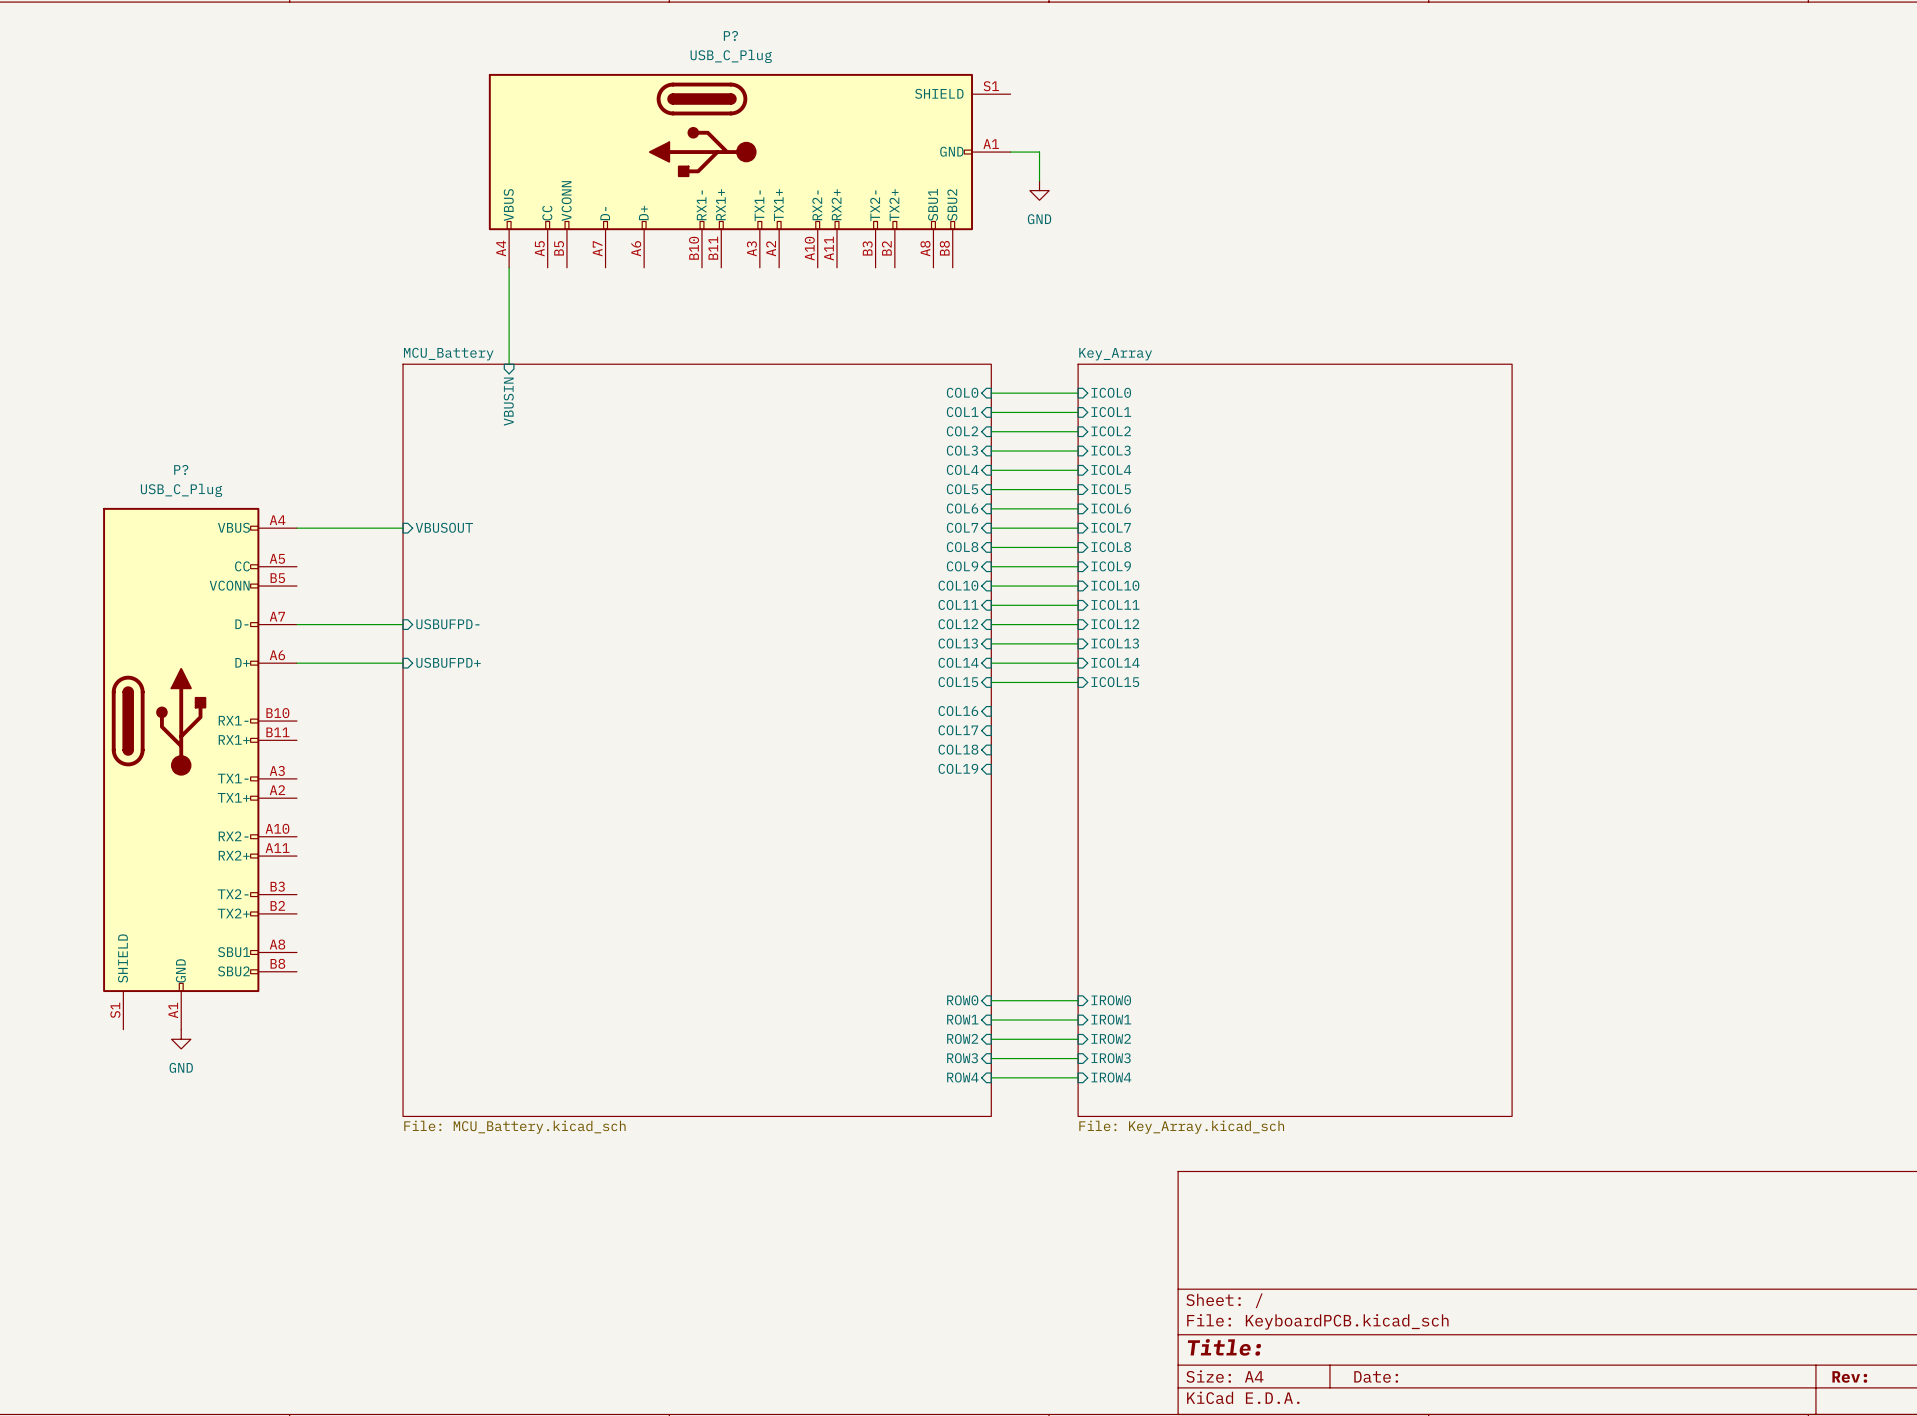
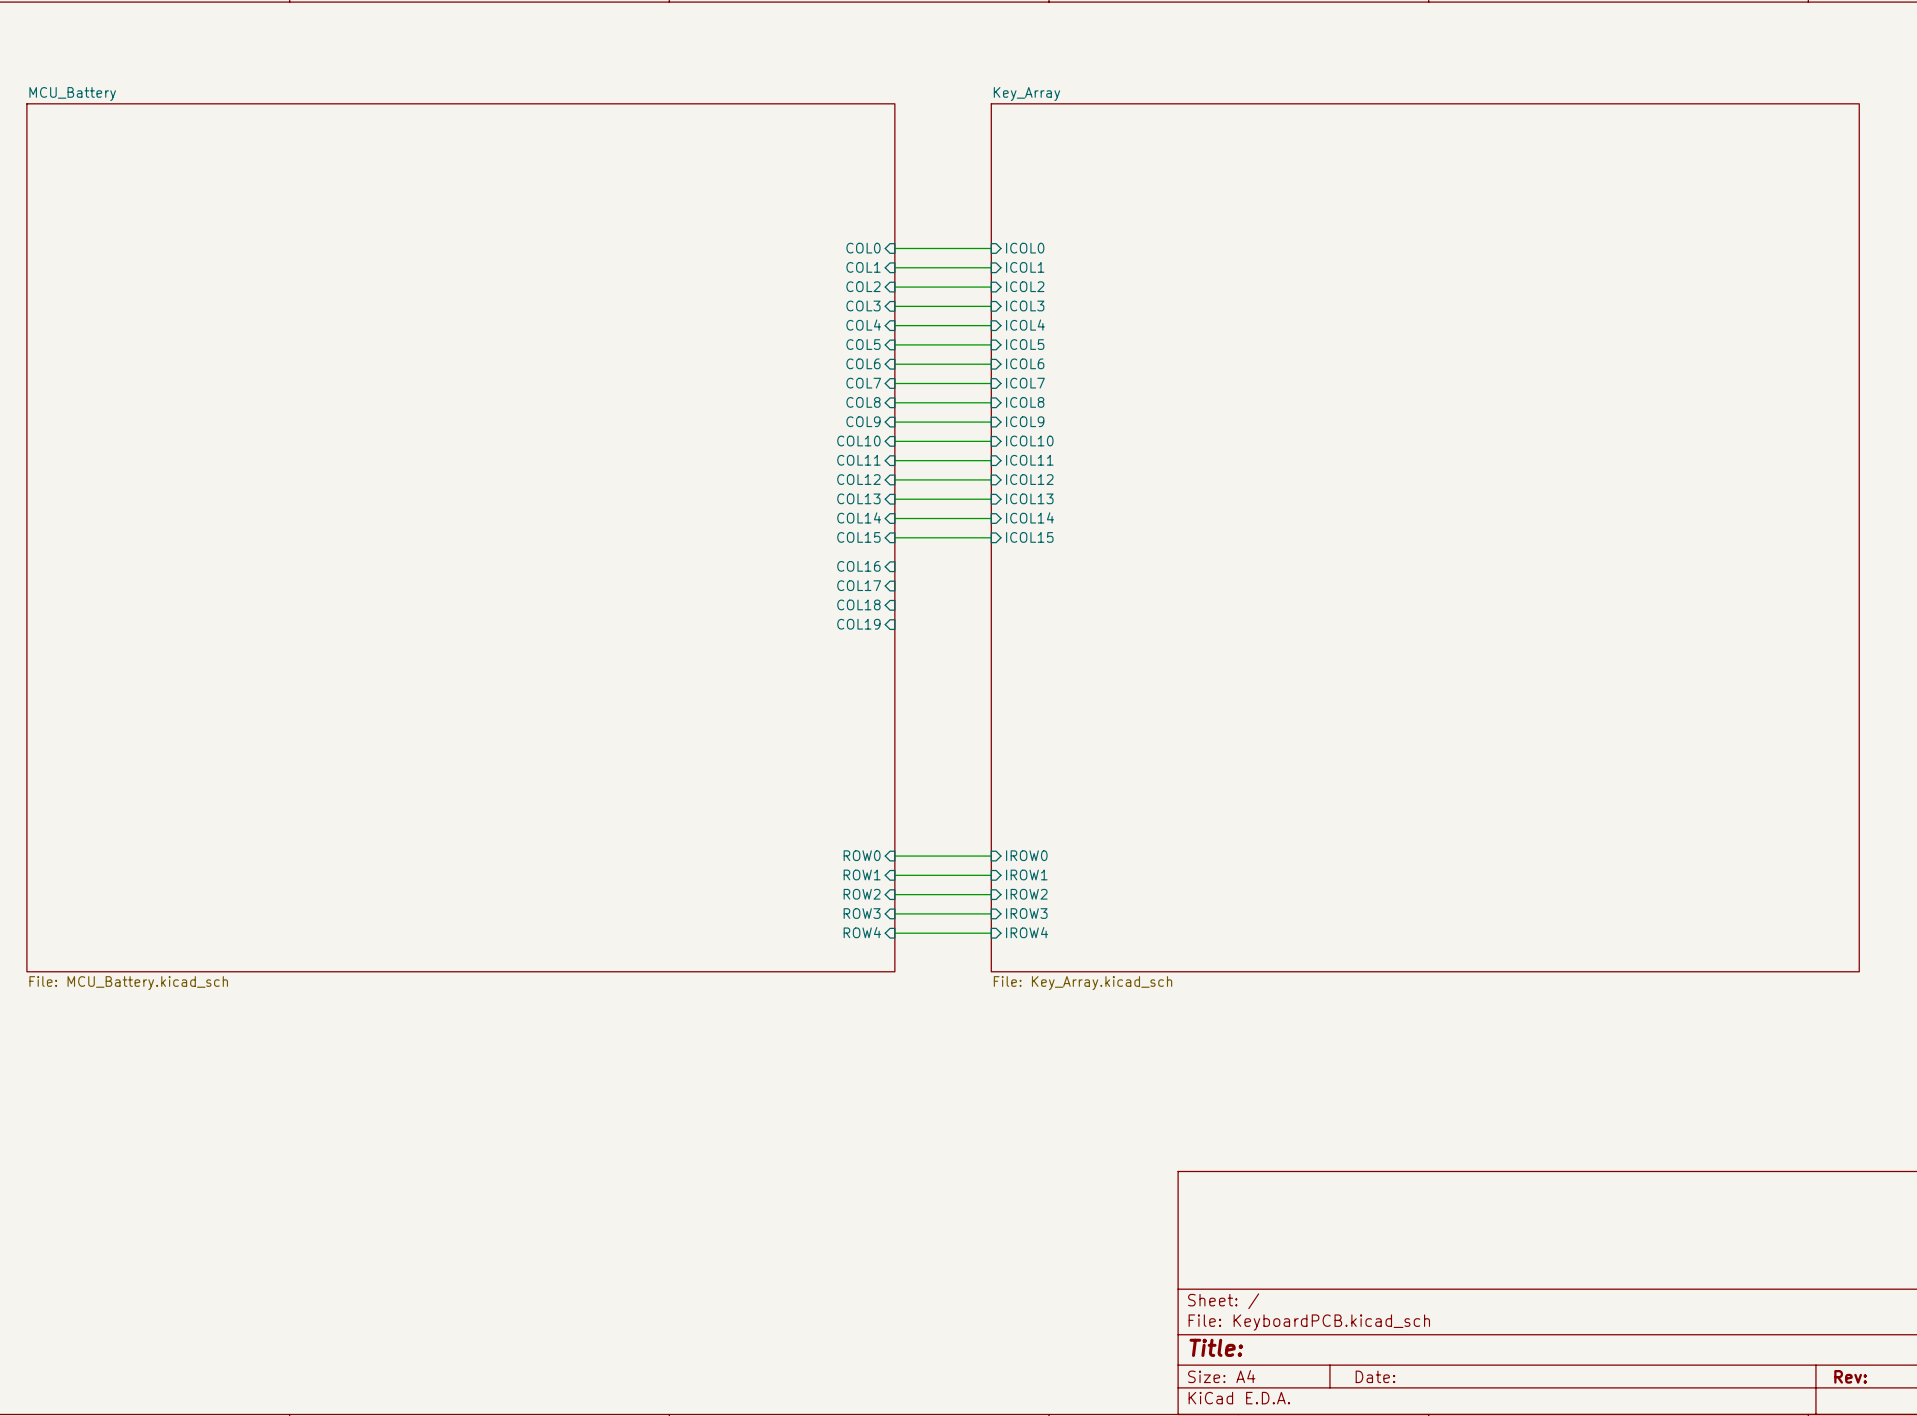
wire: (1010, 152) (1039, 152) (1039, 180) -> none
P?: USB_C_Plug (749, 170) -> none
power symbol: GND (1039, 190) -> none
wire: none -> (894, 248) (991, 248)
wire: (509, 267) (509, 364) -> none
wire: none -> (894, 267) (991, 267)
wire: none -> (894, 287) (991, 287)
wire: none -> (894, 306) (991, 306)
wire: none -> (894, 325) (991, 325)
wire: none -> (894, 344) (991, 344)
wire: none -> (894, 383) (991, 383)
sheet pin position: COL0 (962, 392) -> COL0 (863, 248)
sheet pin position: ICOL0 (1111, 392) -> ICOL0 (1025, 248)
wire: (991, 393) (1078, 393) -> none
sheet pin: VBUSIN (508, 401) -> none
wire: none -> (894, 402) (991, 402)
sheet pin position: COL1 (962, 412) -> COL1 (863, 267)
wire: (991, 412) (1078, 412) -> none
sheet pin position: ICOL1 (1111, 412) -> ICOL1 (1025, 267)
wire: none -> (894, 422) (991, 422)
sheet pin position: COL2 (962, 431) -> COL2 (863, 286)
wire: (991, 431) (1078, 431) -> none
sheet pin position: ICOL2 (1111, 431) -> ICOL2 (1025, 286)
wire: none -> (894, 441) (991, 441)
sheet pin position: COL3 (962, 450) -> COL3 (863, 305)
sheet pin position: ICOL3 (1111, 450) -> ICOL3 (1025, 305)
wire: (991, 451) (1078, 451) -> none
wire: none -> (894, 460) (991, 460)
sheet pin position: COL4 (962, 469) -> COL4 (863, 325)
sheet pin position: ICOL4 (1111, 469) -> ICOL4 (1025, 325)
wire: (991, 470) (1078, 470) -> none
wire: none -> (894, 479) (991, 479)
sheet pin position: COL5 (962, 489) -> COL5 (863, 344)
wire: (991, 489) (1078, 489) -> none
sheet pin position: ICOL5 (1111, 489) -> ICOL5 (1025, 344)
wire: none -> (894, 499) (991, 499)
sheet pin position: COL6 (962, 508) -> COL6 (863, 363)
wire: (991, 508) (1078, 508) -> none
sheet pin position: ICOL6 (1111, 508) -> ICOL6 (1025, 363)
wire: none -> (894, 518) (991, 518)
sheet pin: VBUSOUT (444, 527) -> none
sheet pin position: COL7 (962, 527) -> COL7 (863, 383)
sheet pin position: ICOL7 (1111, 527) -> ICOL7 (1025, 383)
wire: (296, 528) (403, 528) -> none
wire: (991, 528) (1078, 528) -> none
sheet MCU_Battery: none -> File: MCU_Battery.kicad_sch (460, 537)
wire: none -> (894, 537) (991, 537)
sheet Key_Array: none -> File: Key_Array.kicad_sch (1425, 537)
sheet pin position: COL8 (962, 547) -> COL8 (863, 402)
wire: (991, 547) (1078, 547) -> none
sheet pin position: ICOL8 (1111, 547) -> ICOL8 (1025, 402)
sheet pin position: COL9 (962, 566) -> COL9 (863, 421)
wire: (991, 566) (1078, 566) -> none
sheet pin position: ICOL9 (1111, 566) -> ICOL9 (1025, 421)
sheet pin position: COL10 (958, 585) -> COL10 (858, 441)
sheet pin position: ICOL10 (1115, 585) -> ICOL10 (1029, 441)
wire: (991, 586) (1078, 586) -> none
sheet pin position: COL11 (958, 604) -> COL11 (858, 460)
sheet pin position: ICOL11 (1115, 604) -> ICOL11 (1029, 460)
wire: (991, 605) (1078, 605) -> none
wire: (296, 624) (403, 624) -> none
sheet pin: USBUFPD- (447, 624) -> none
sheet pin position: COL12 (958, 624) -> COL12 (858, 479)
wire: (991, 624) (1078, 624) -> none
sheet pin position: ICOL12 (1115, 624) -> ICOL12 (1029, 479)
sheet pin position: COL13 (958, 643) -> COL13 (858, 498)
wire: (991, 643) (1078, 643) -> none
sheet pin position: ICOL13 (1115, 643) -> ICOL13 (1029, 498)
sheet pin: USBUFPD+ (448, 662) -> none
sheet pin position: COL14 (958, 662) -> COL14 (859, 517)
sheet pin position: ICOL14 (1115, 662) -> ICOL14 (1030, 517)
wire: (296, 663) (403, 663) -> none
wire: (991, 663) (1078, 663) -> none
sheet pin position: COL15 (958, 682) -> COL15 (858, 537)
wire: (991, 682) (1078, 682) -> none
sheet pin position: ICOL15 (1115, 682) -> ICOL15 (1029, 537)
sheet pin position: COL16 (958, 711) -> COL16 (858, 566)
sheet pin position: COL17 (958, 730) -> COL17 (859, 585)
sheet MCU_Battery: File: MCU_Battery.kicad_sch (697, 740) -> none
sheet Key_Array: File: Key_Array.kicad_sch (1295, 740) -> none
sheet pin position: COL18 (958, 749) -> COL18 (858, 604)
P?: USB_C_Plug (200, 768) -> none
sheet pin position: COL19 (958, 768) -> COL19 (858, 624)
wire: none -> (894, 856) (991, 856)
wire: none -> (894, 875) (991, 875)
wire: none -> (894, 894) (991, 894)
wire: none -> (894, 913) (991, 913)
wire: none -> (894, 933) (991, 933)
sheet pin position: ROW0 (962, 1000) -> ROW0 (862, 855)
wire: (991, 1000) (1078, 1000) -> none
sheet pin position: IROW0 (1111, 1000) -> IROW0 (1026, 855)
sheet pin position: ROW1 (962, 1019) -> ROW1 (862, 874)
wire: (991, 1019) (1078, 1019) -> none
sheet pin position: IROW1 (1111, 1019) -> IROW1 (1026, 874)
sheet pin position: ROW2 (962, 1038) -> ROW2 (862, 894)
sheet pin position: IROW2 (1111, 1038) -> IROW2 (1026, 894)
power symbol: GND (181, 1039) -> none
wire: (991, 1039) (1078, 1039) -> none
sheet pin position: ROW3 (962, 1058) -> ROW3 (862, 913)
wire: (991, 1058) (1078, 1058) -> none
sheet pin position: IROW3 (1111, 1058) -> IROW3 (1026, 913)
sheet pin position: ROW4 (962, 1077) -> ROW4 (862, 932)
wire: (991, 1077) (1078, 1077) -> none
sheet pin position: IROW4 (1111, 1077) -> IROW4 (1027, 932)

